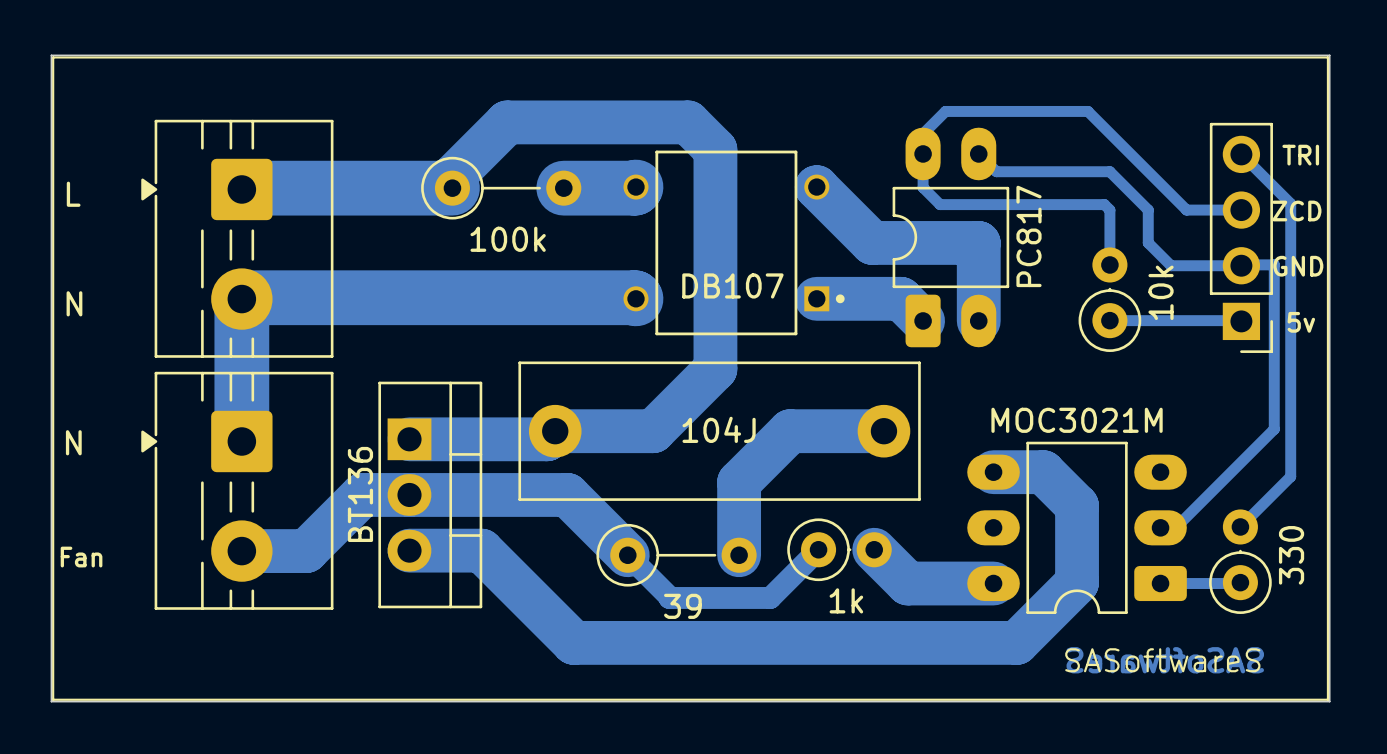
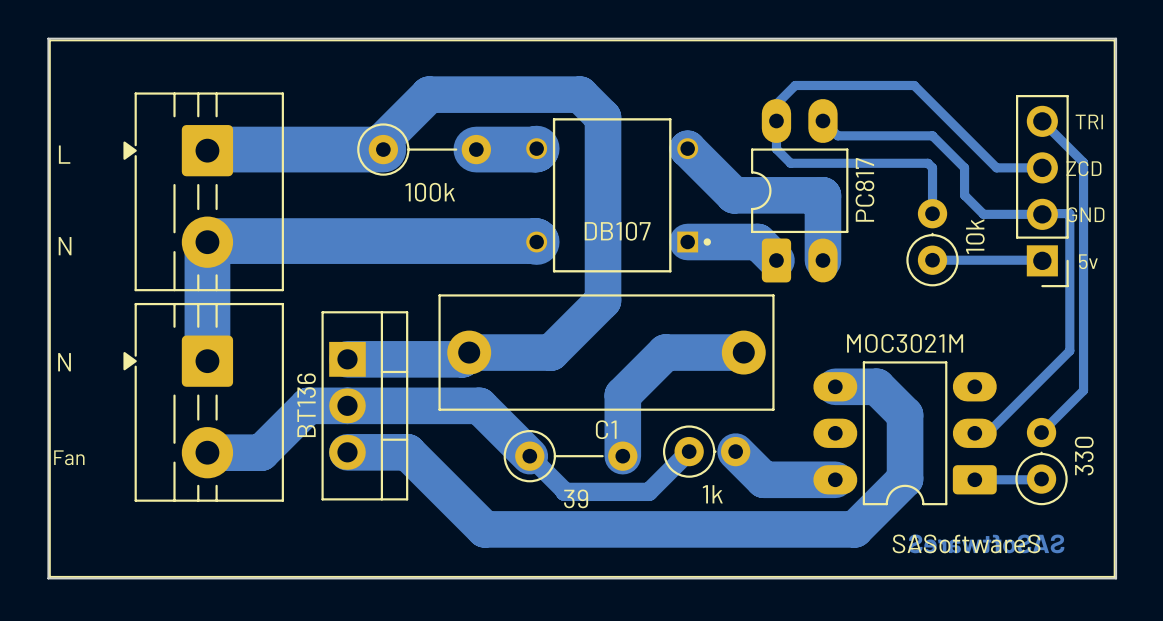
C1 value: 104J (719, 429) -> none
C1 name: none -> C1 (606, 429)

